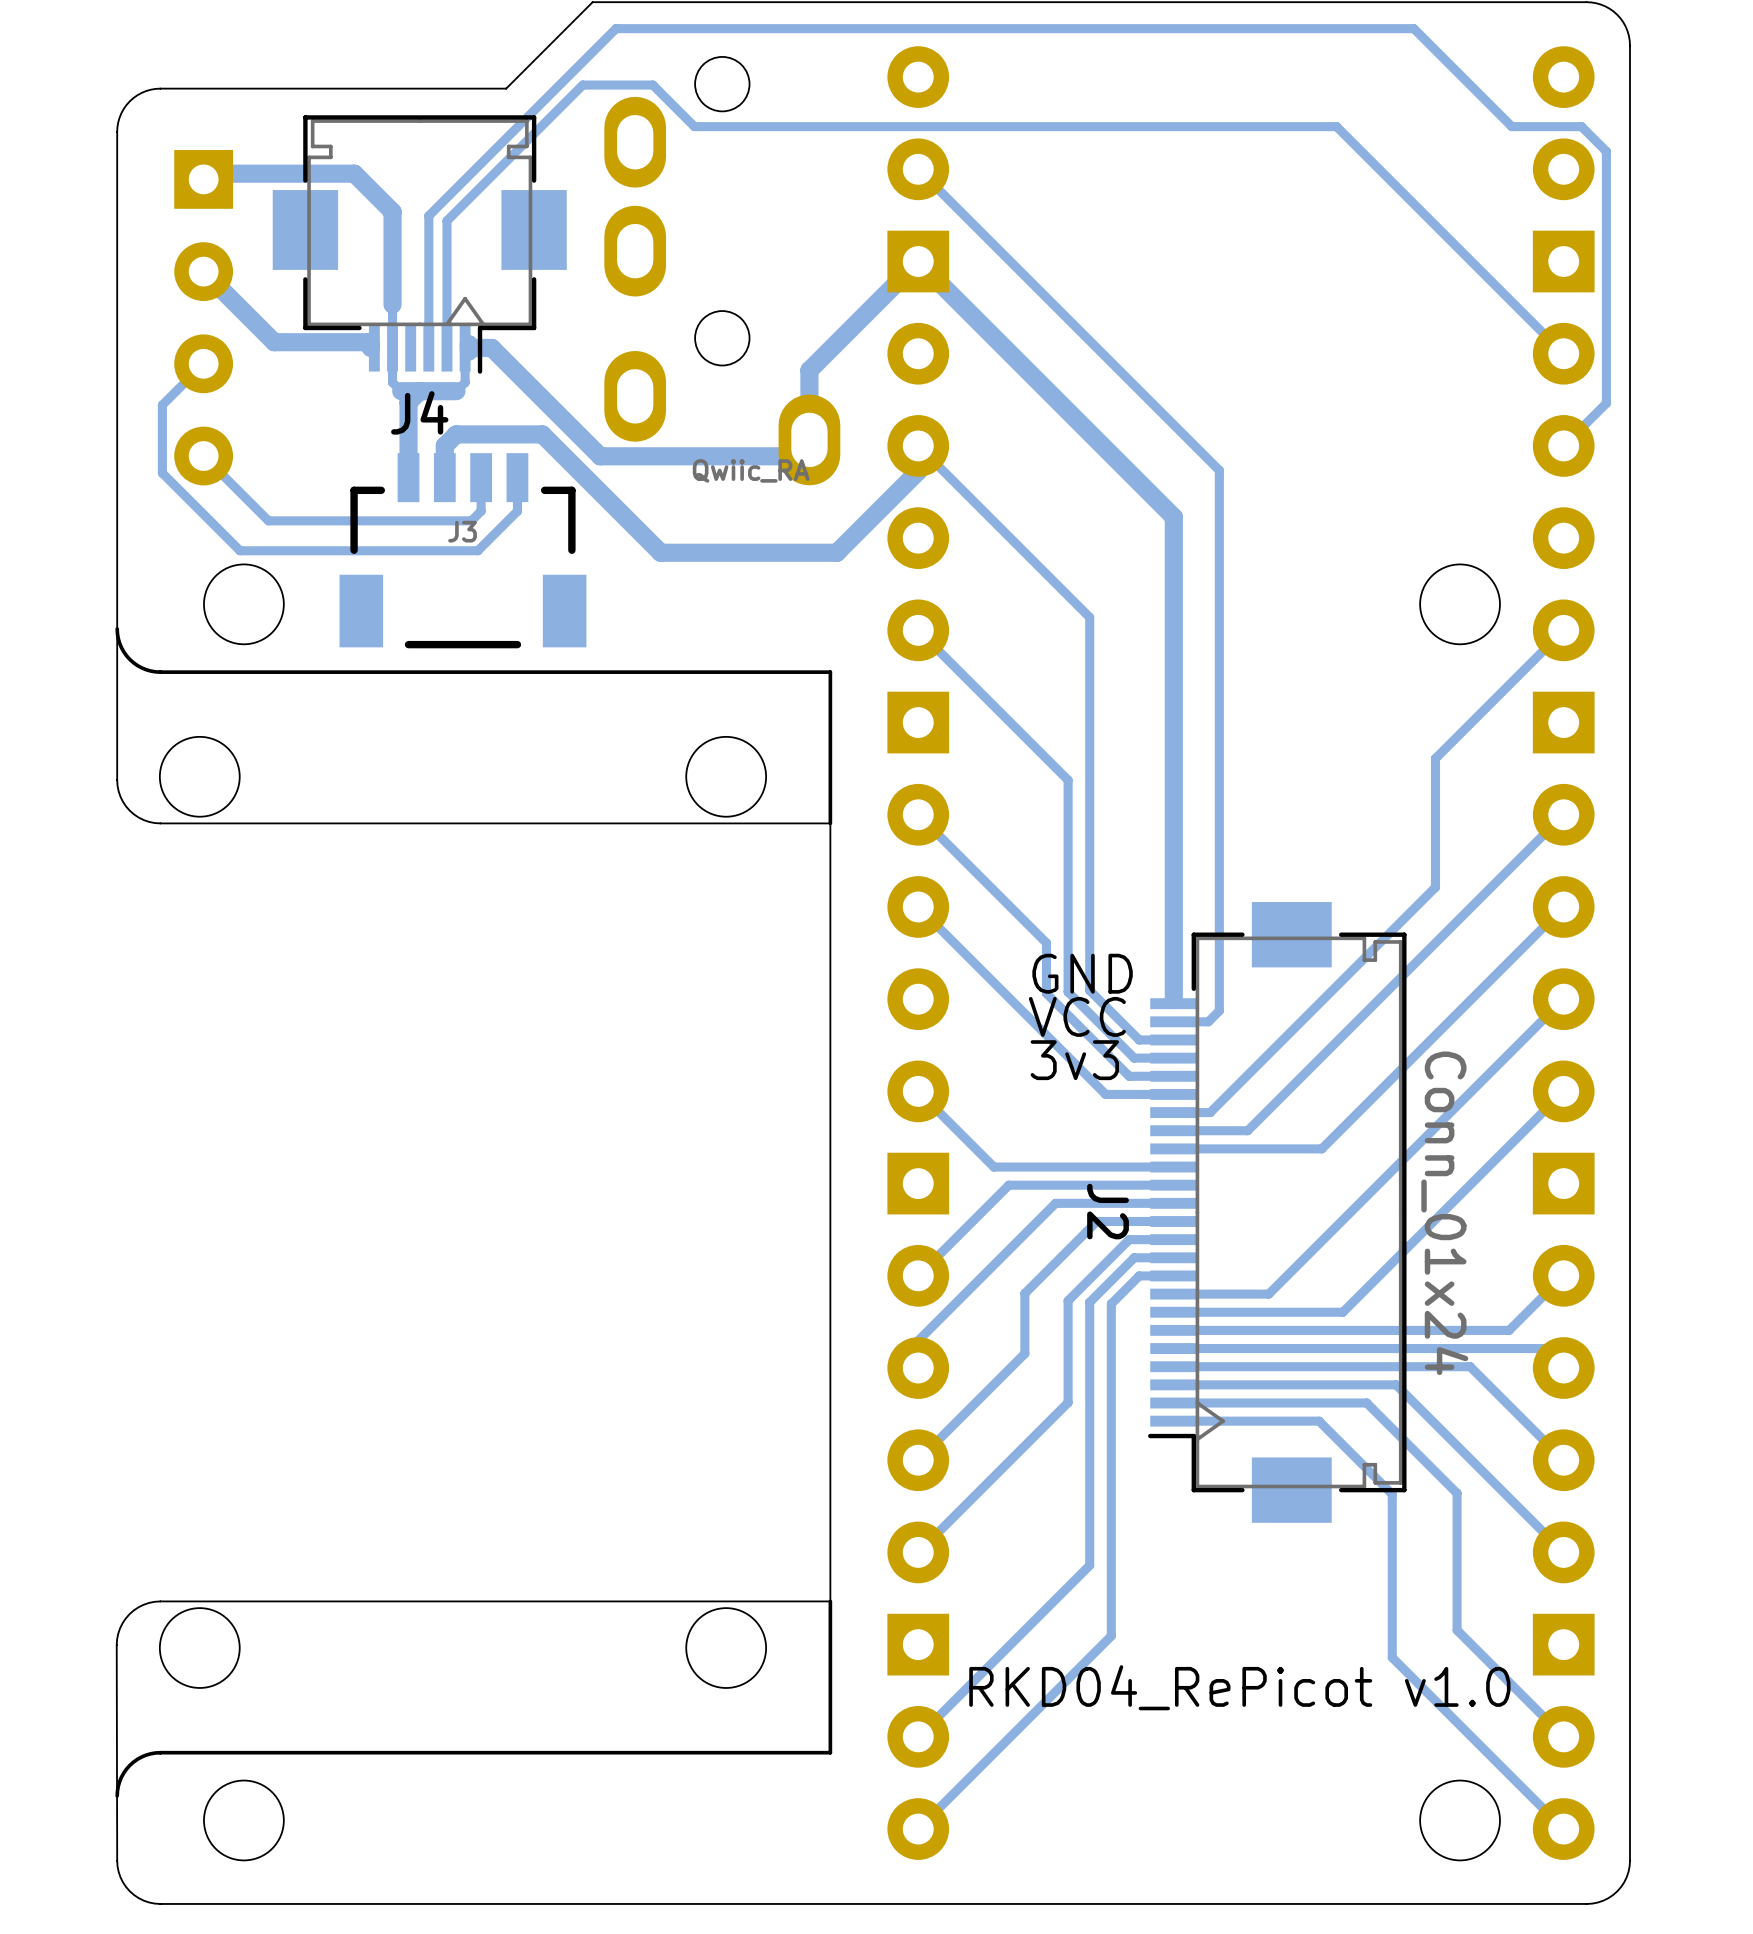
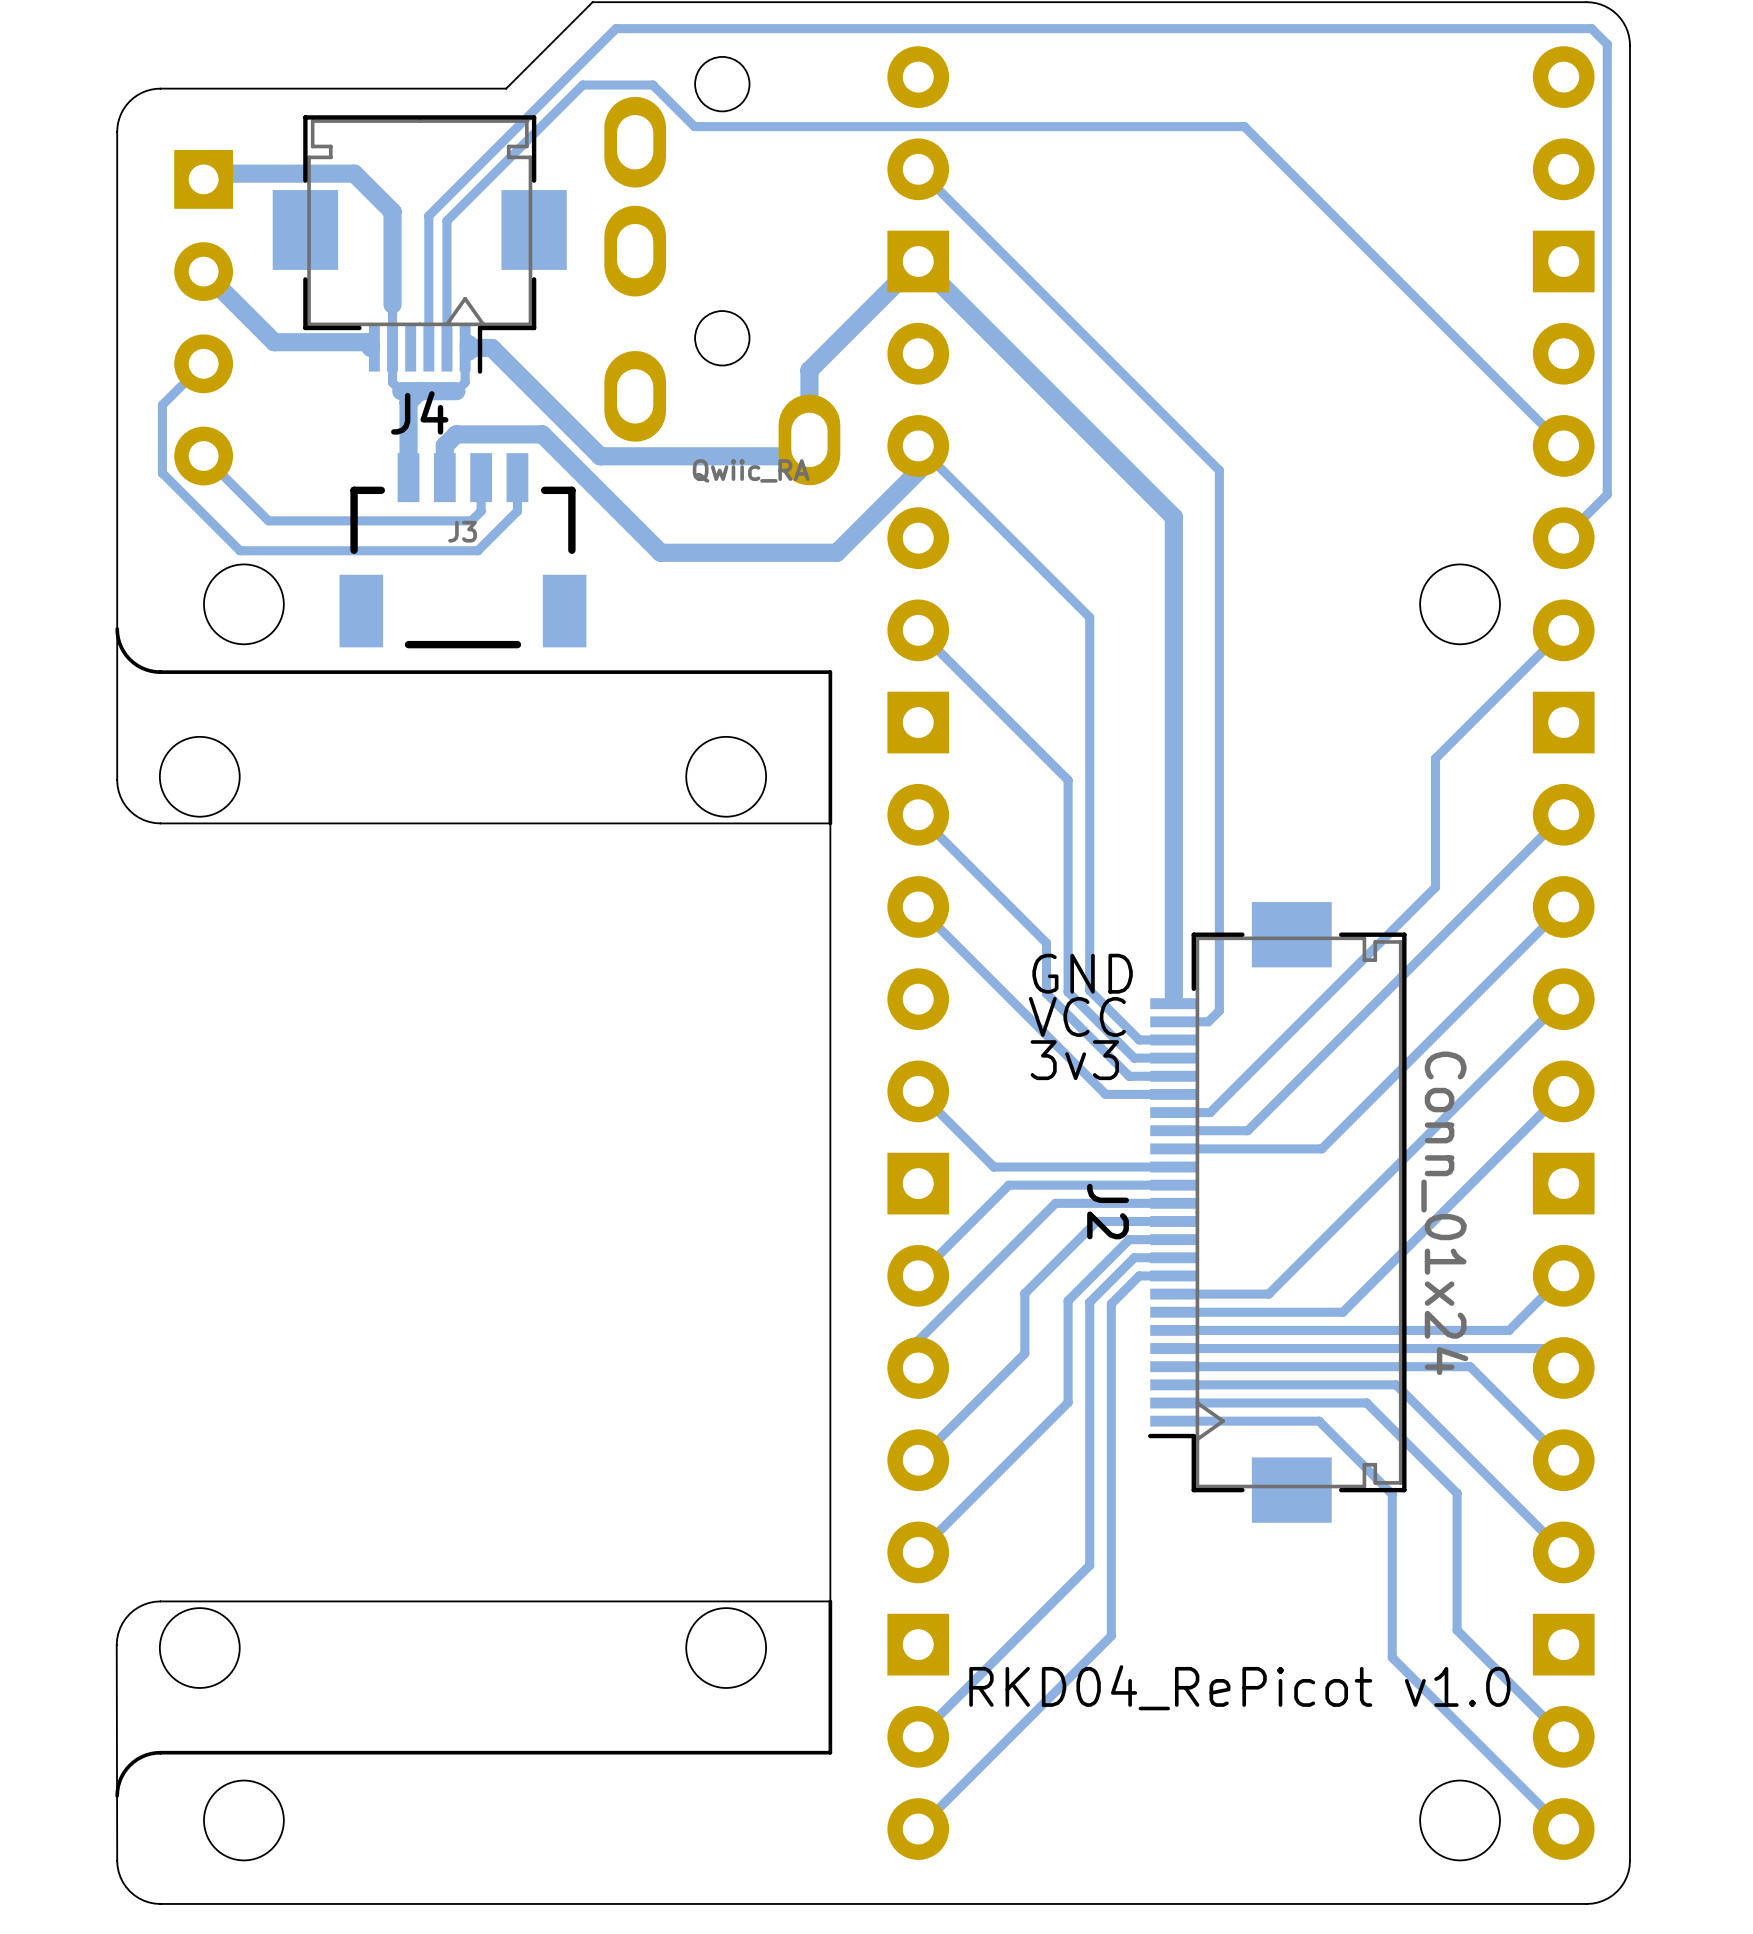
track: (1413, 28) (1511, 126) (1581, 126) (1606, 151) (1606, 403) (1563, 445) -> (1413, 28) (1591, 28) (1607, 44) (1607, 494) (1563, 538)
track: (1244, 126) (1336, 126) (1563, 353) -> (1244, 126) (1552, 434)

